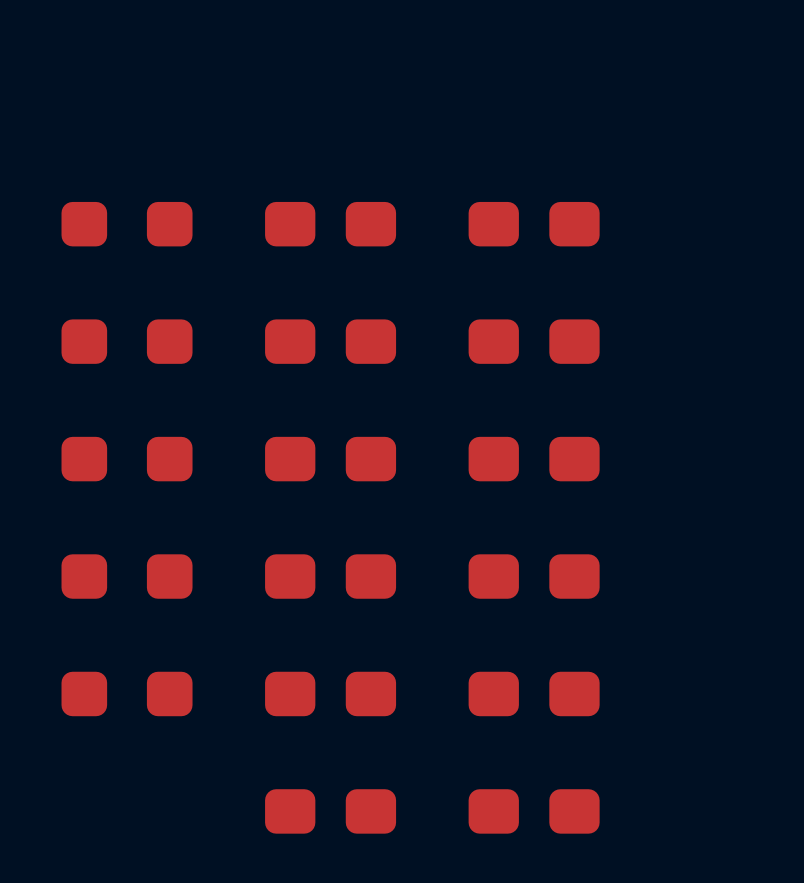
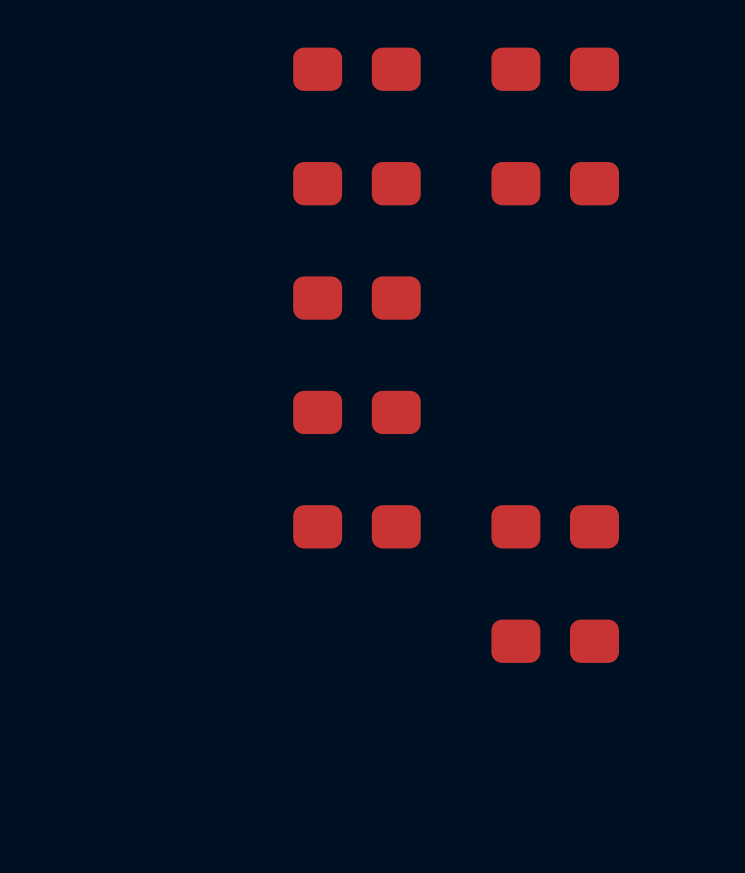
part: (127, 224) -> none
part: (127, 341) -> none
part: (127, 459) -> none
part: (534, 459) -> none
part: (127, 576) -> none
part: (534, 576) -> none
part: (127, 693) -> none
part: (330, 811) -> none

